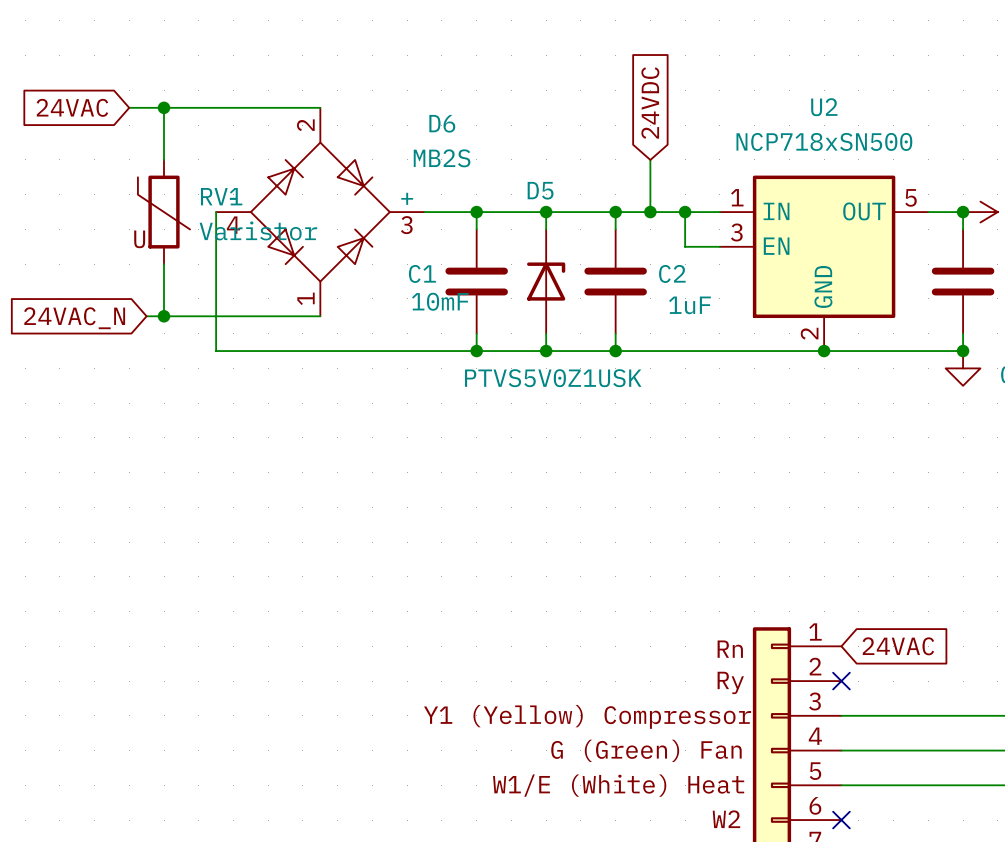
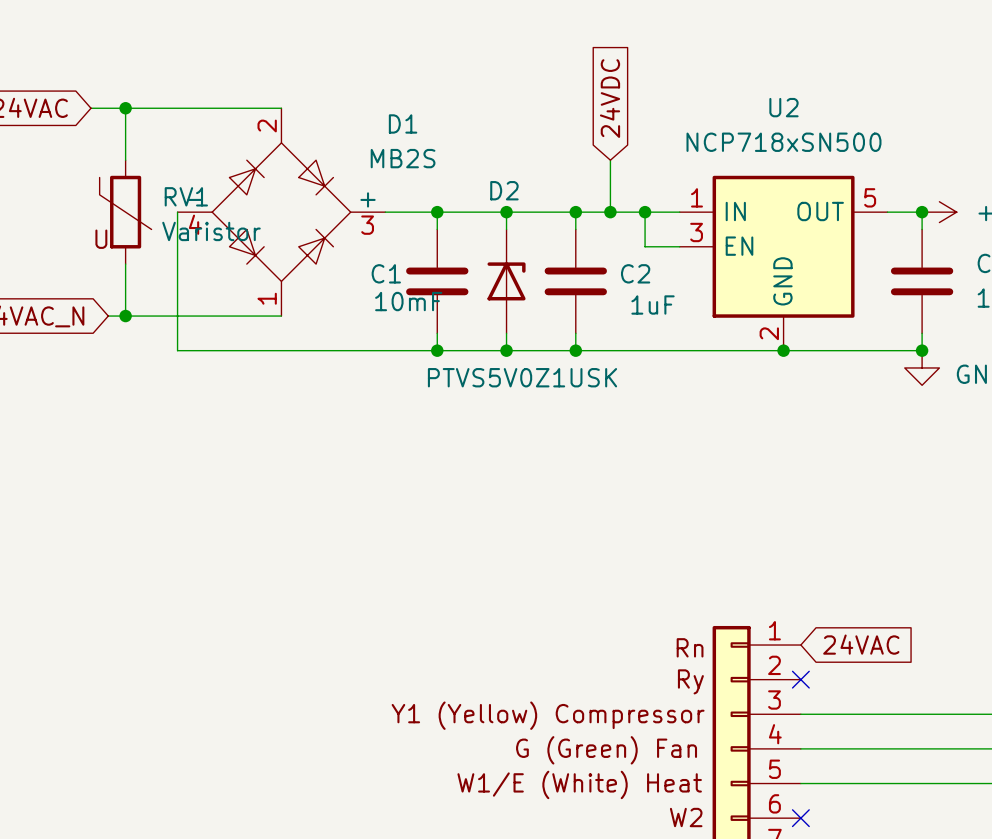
D6 name: D6 (442, 123) -> D1 (403, 123)
D5 name: D5 (540, 190) -> D2 (504, 190)

